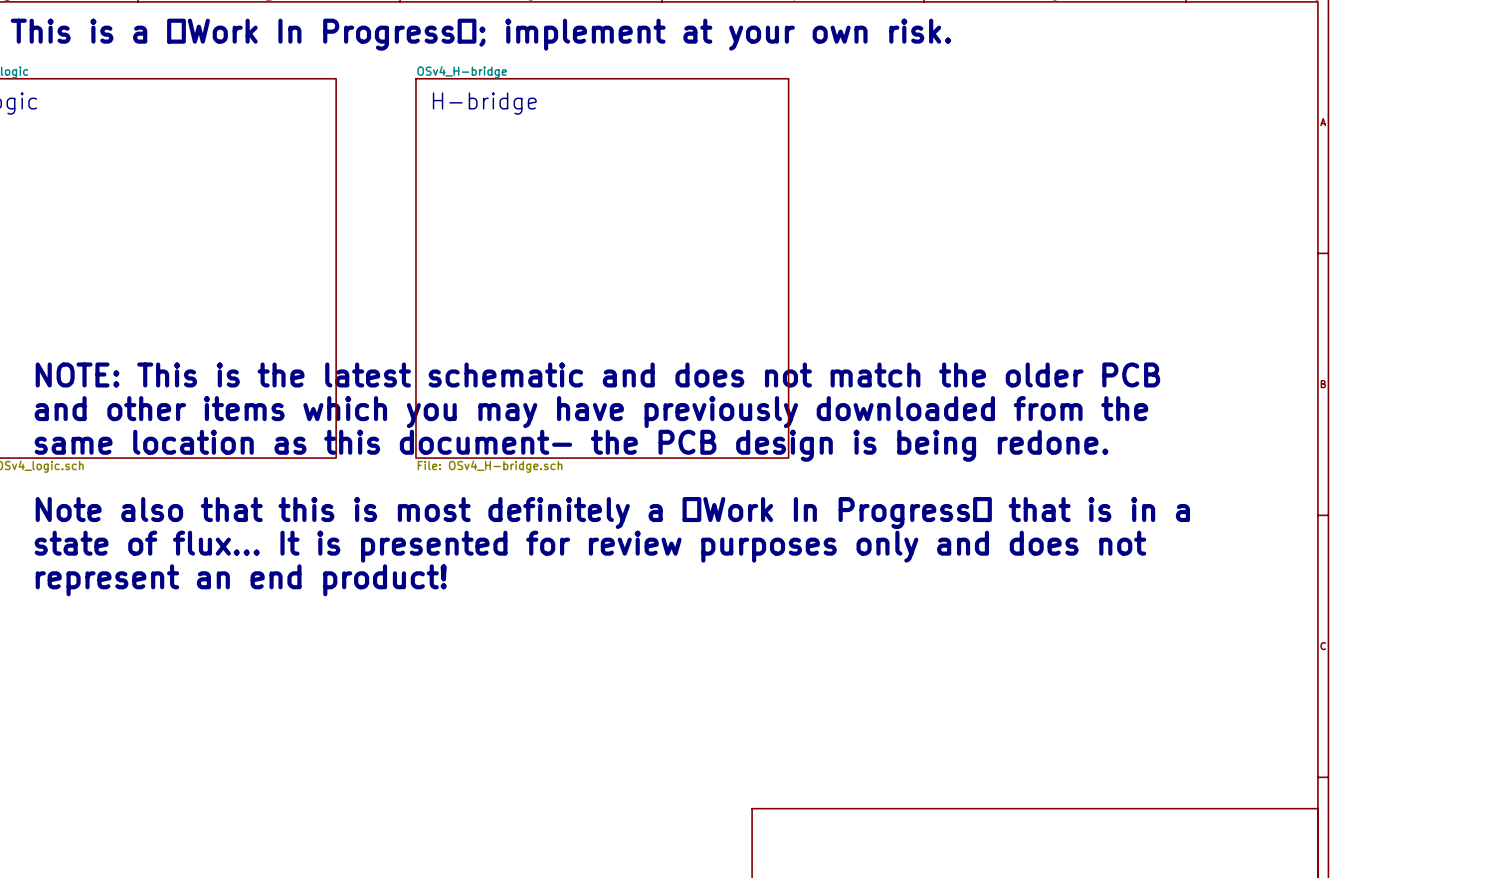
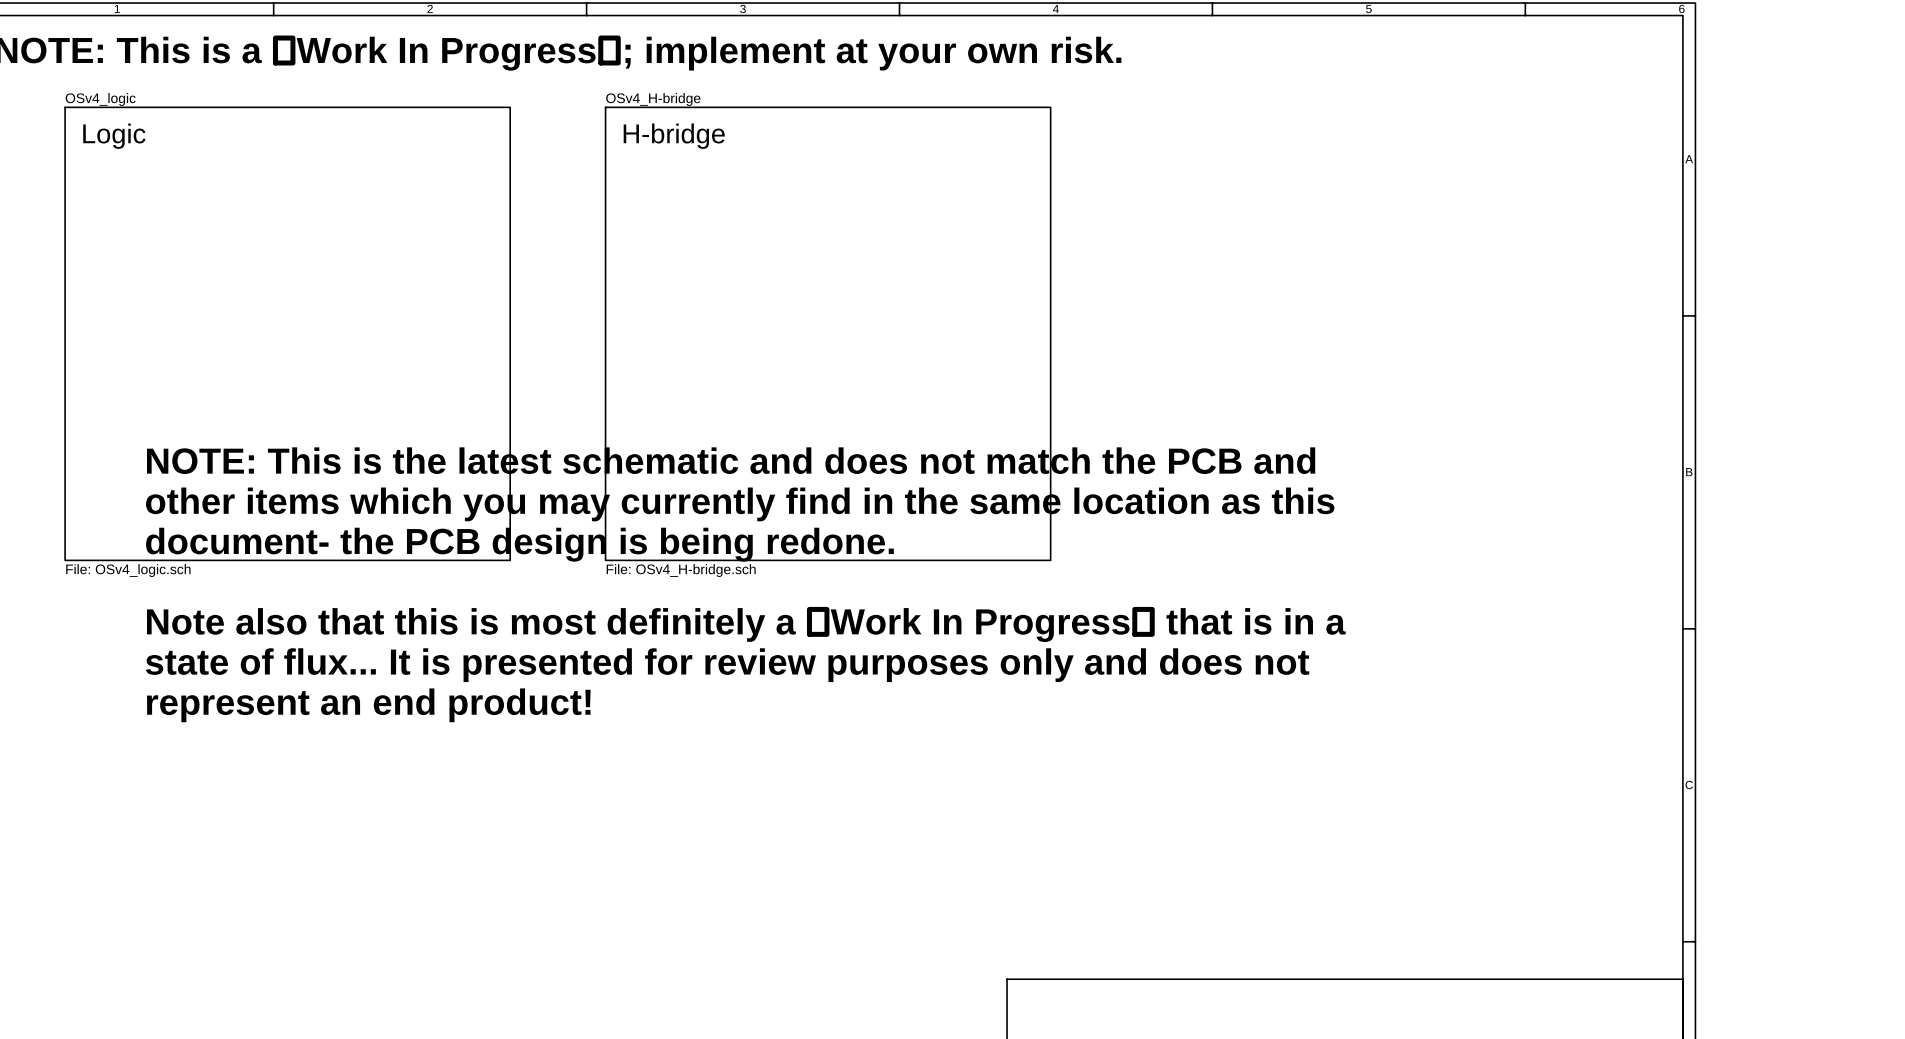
text: NOTE: This is the latest schematic and does not match the older PCB (597, 374) -> NOTE: This is the latest schematic and does not match the PCB and (731, 460)
text: and other items which you may have previously downloaded from the (591, 412) -> other items which you may currently find in the same location as this (740, 504)
text: same location as this document- the PCB design is being redone. (571, 445) -> document- the PCB design is being redone. (519, 544)

